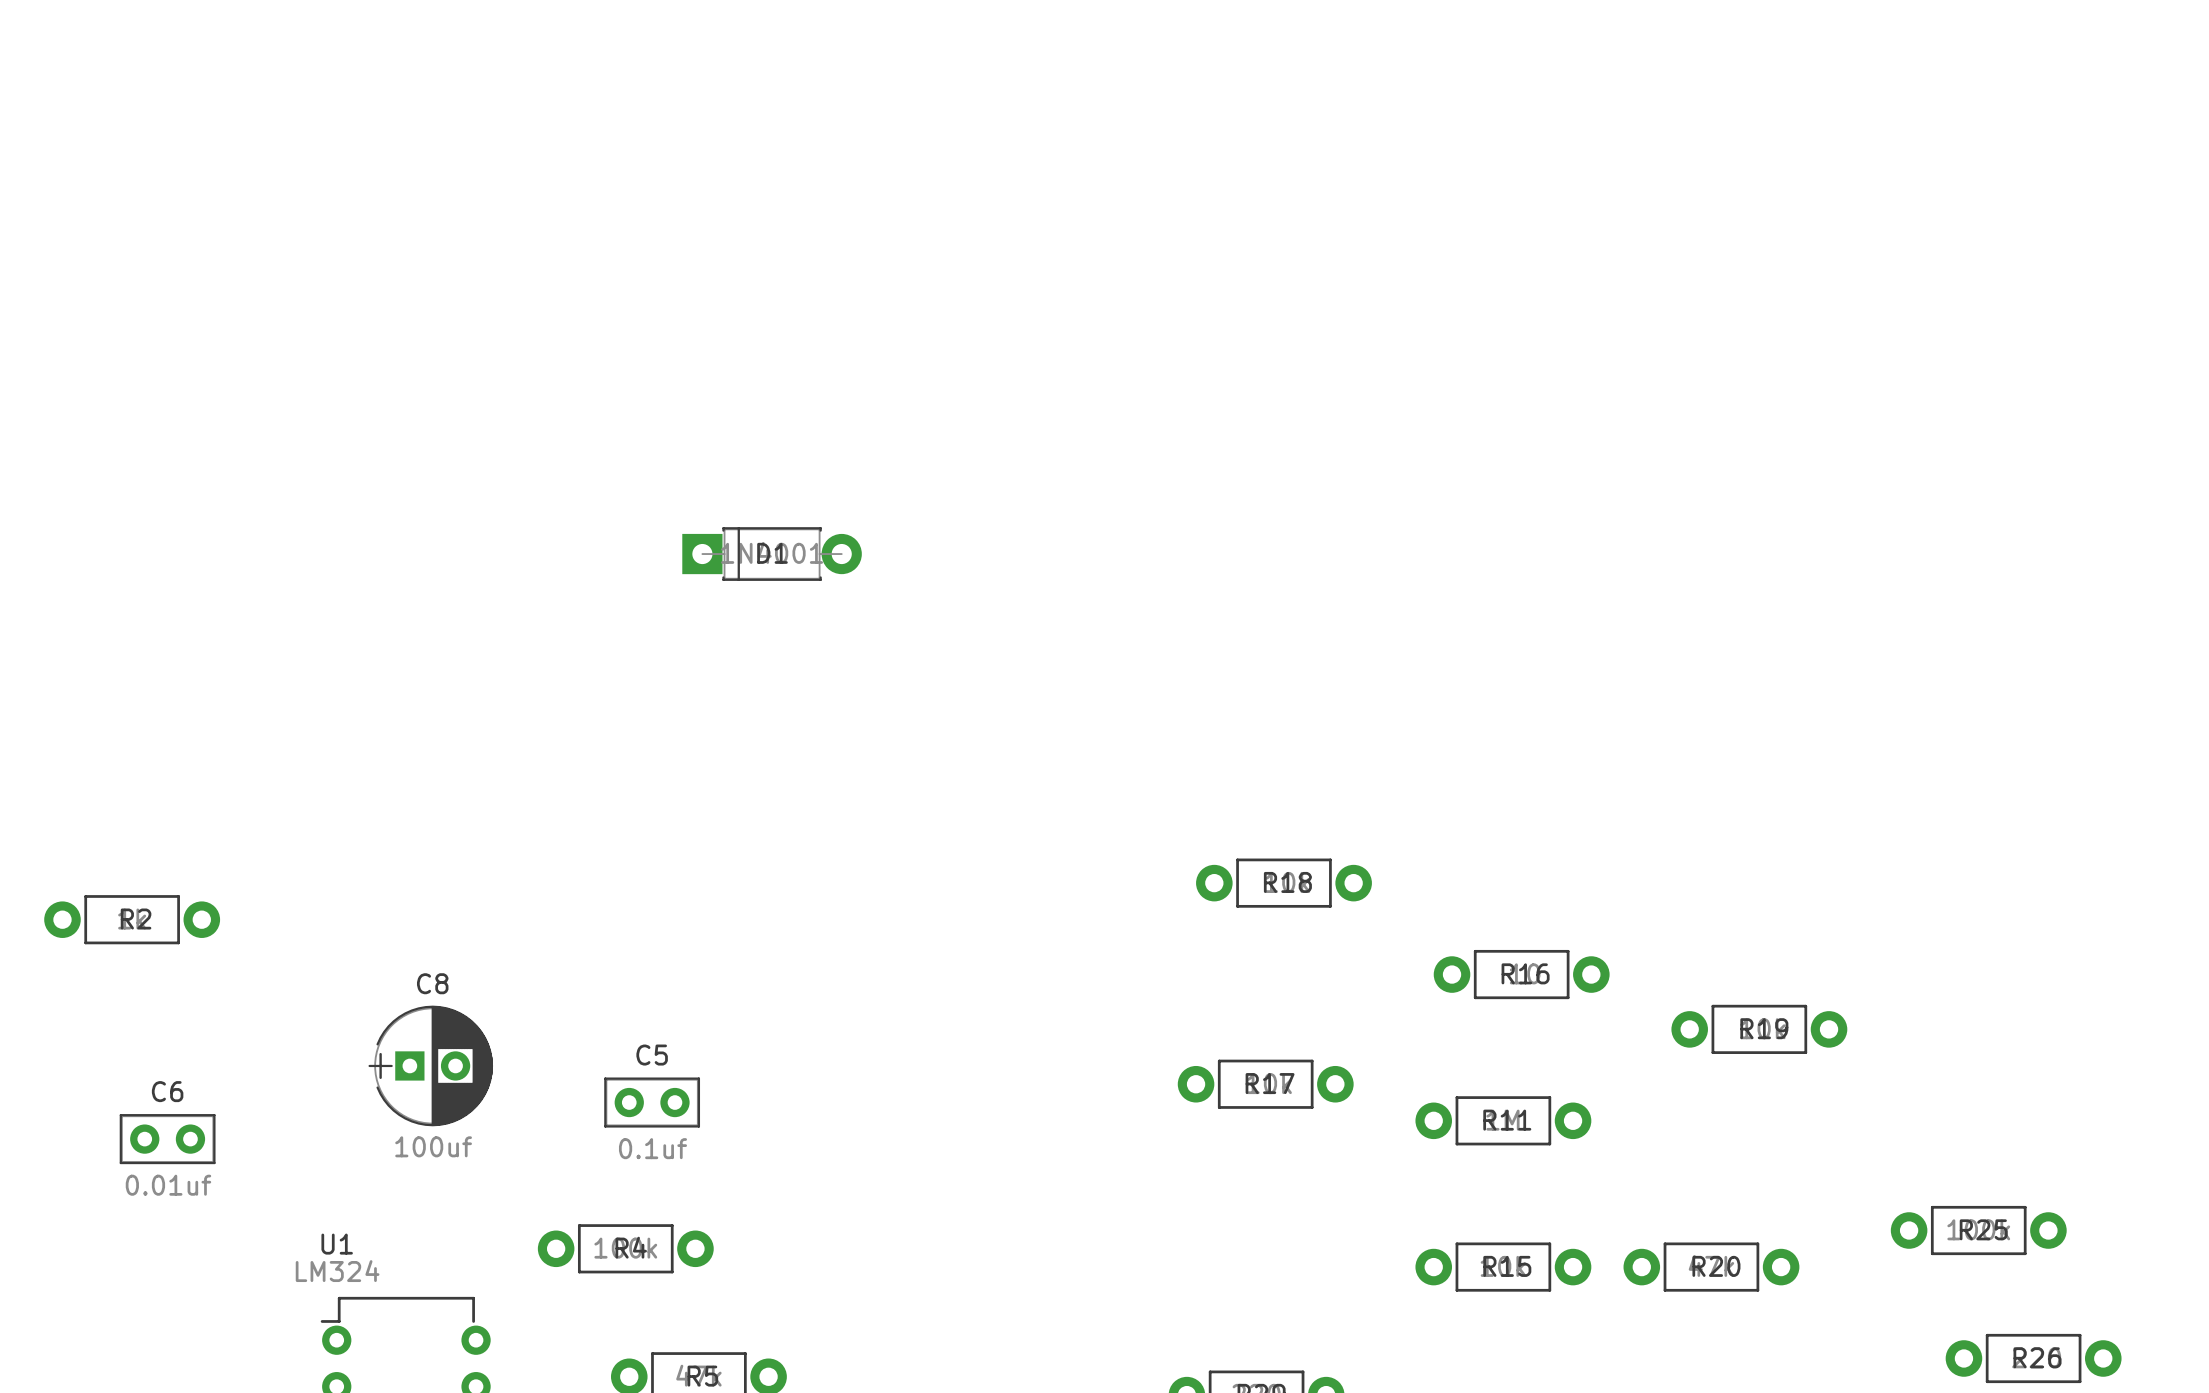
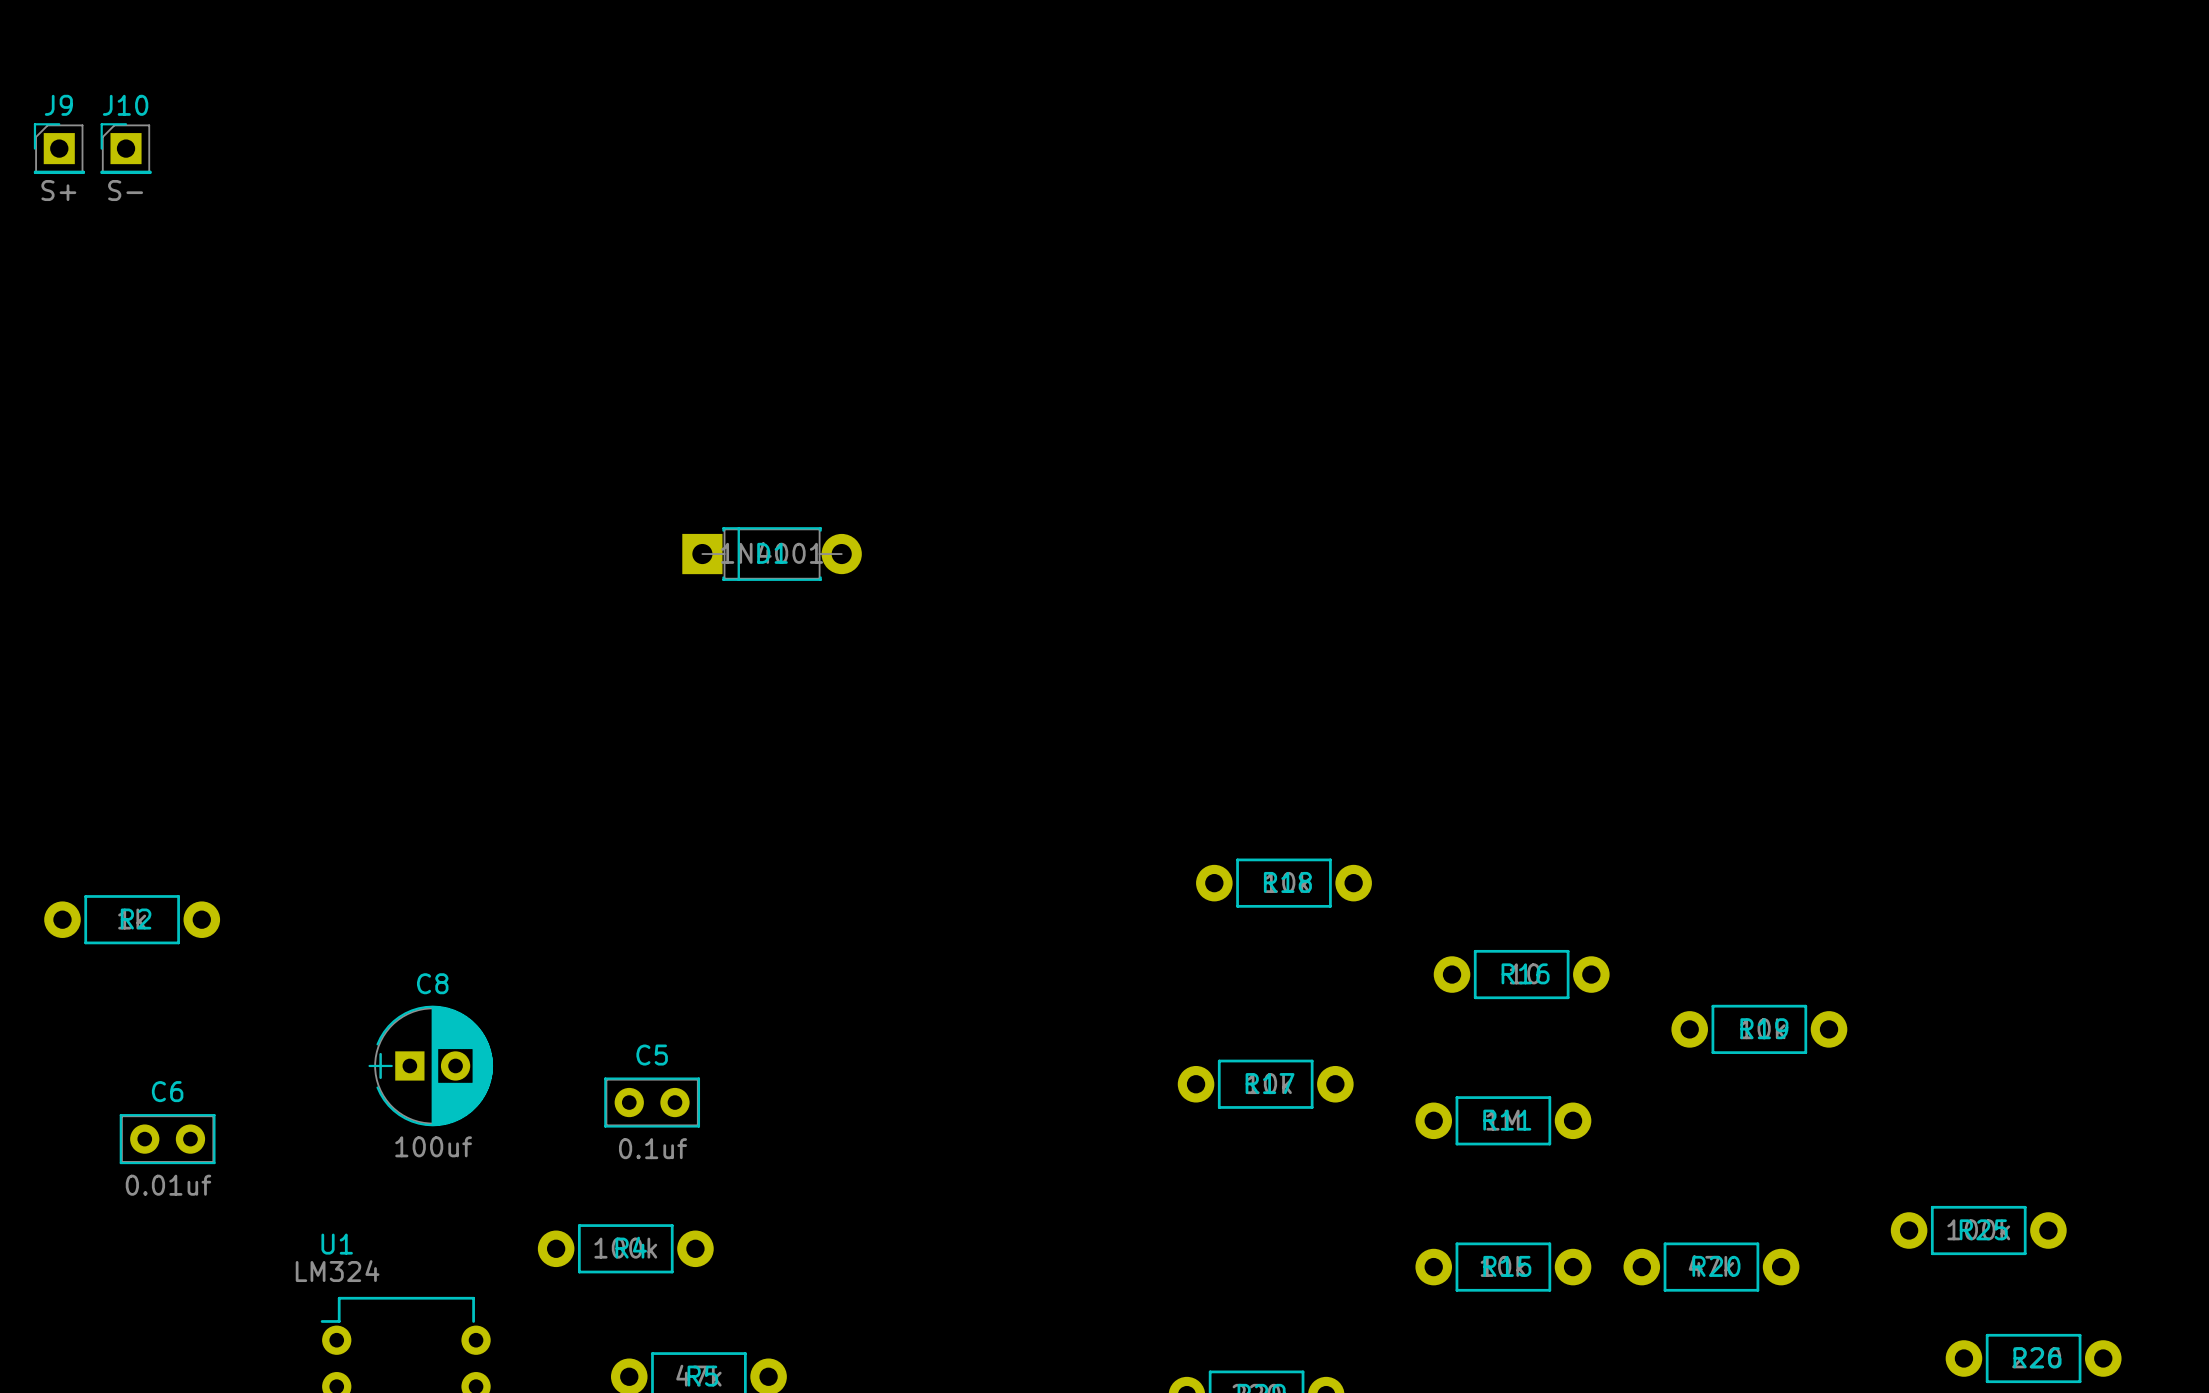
J9: none -> S+ (59, 148)
J10: none -> S- (126, 148)

